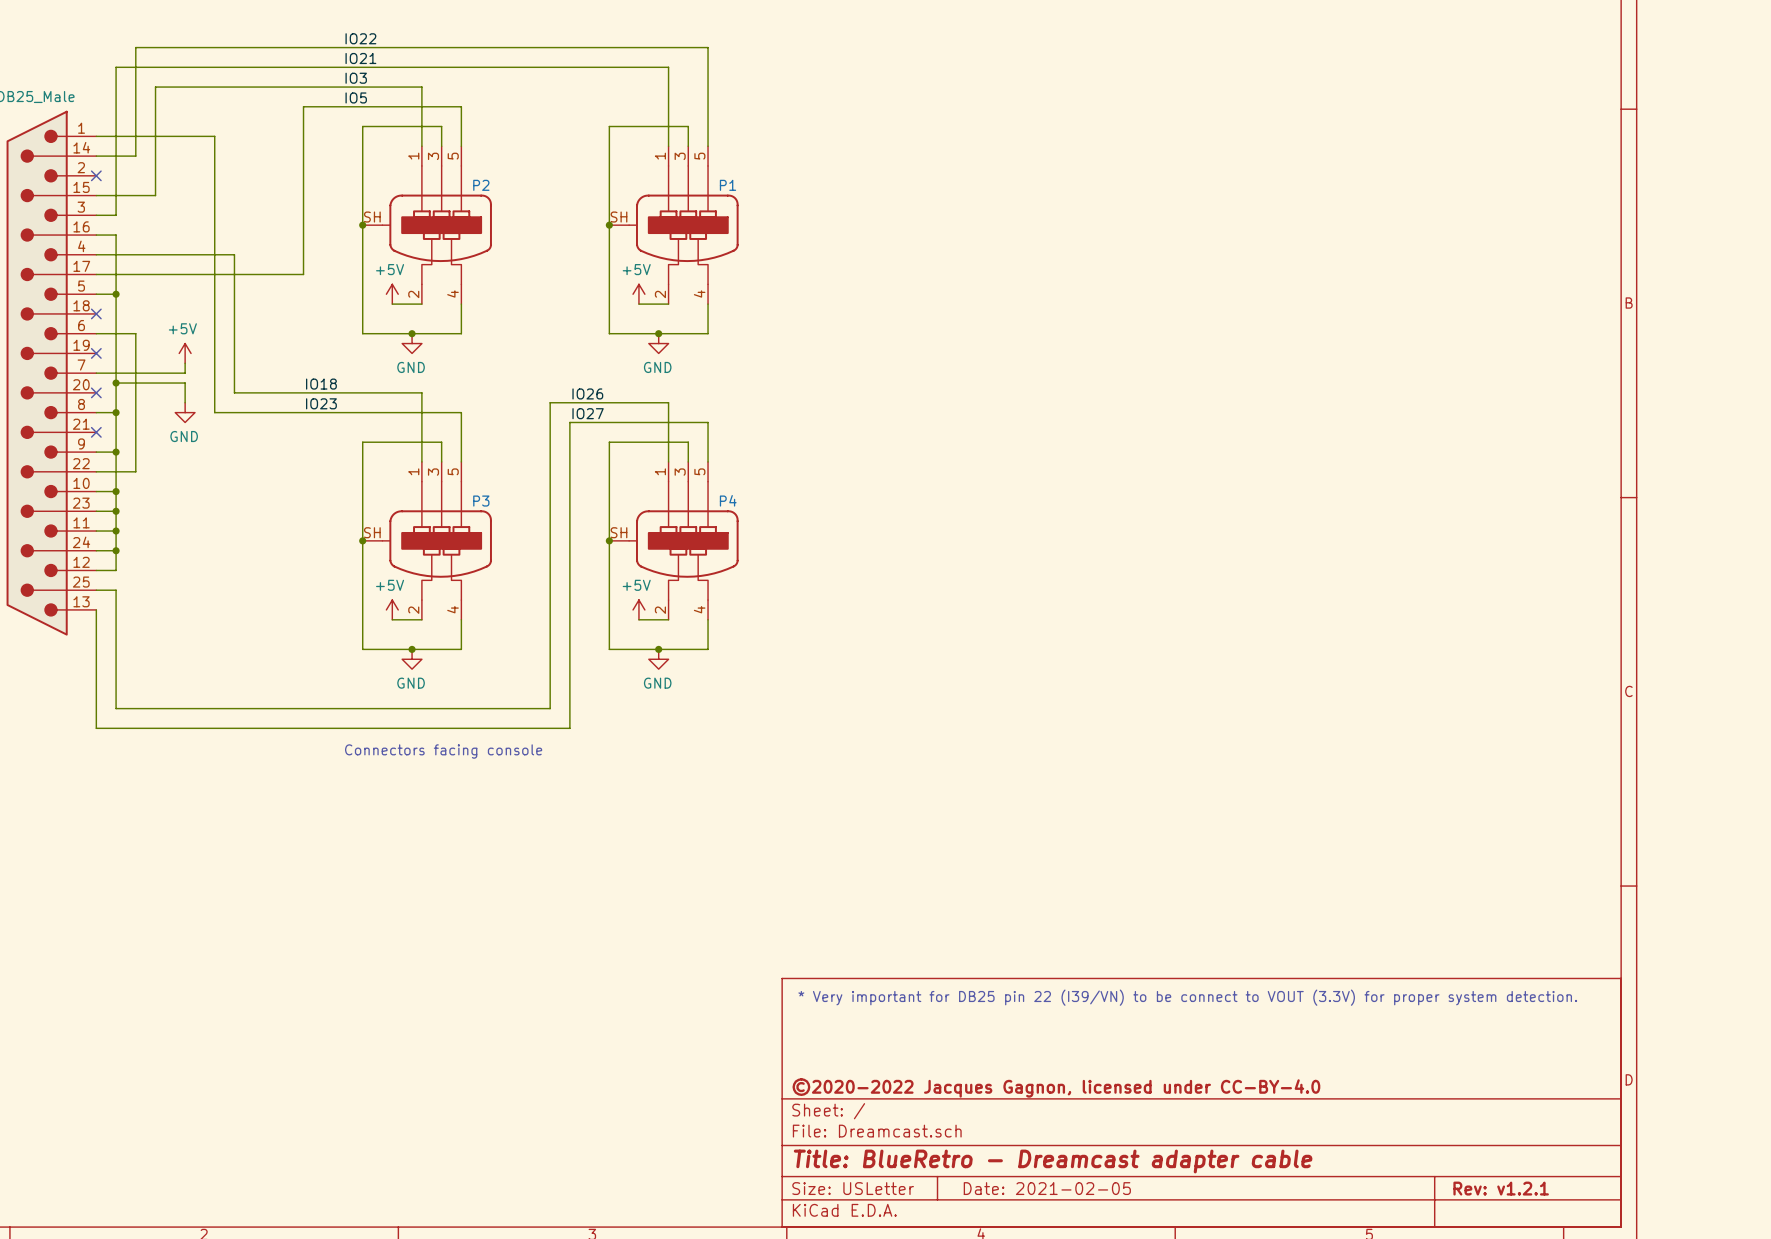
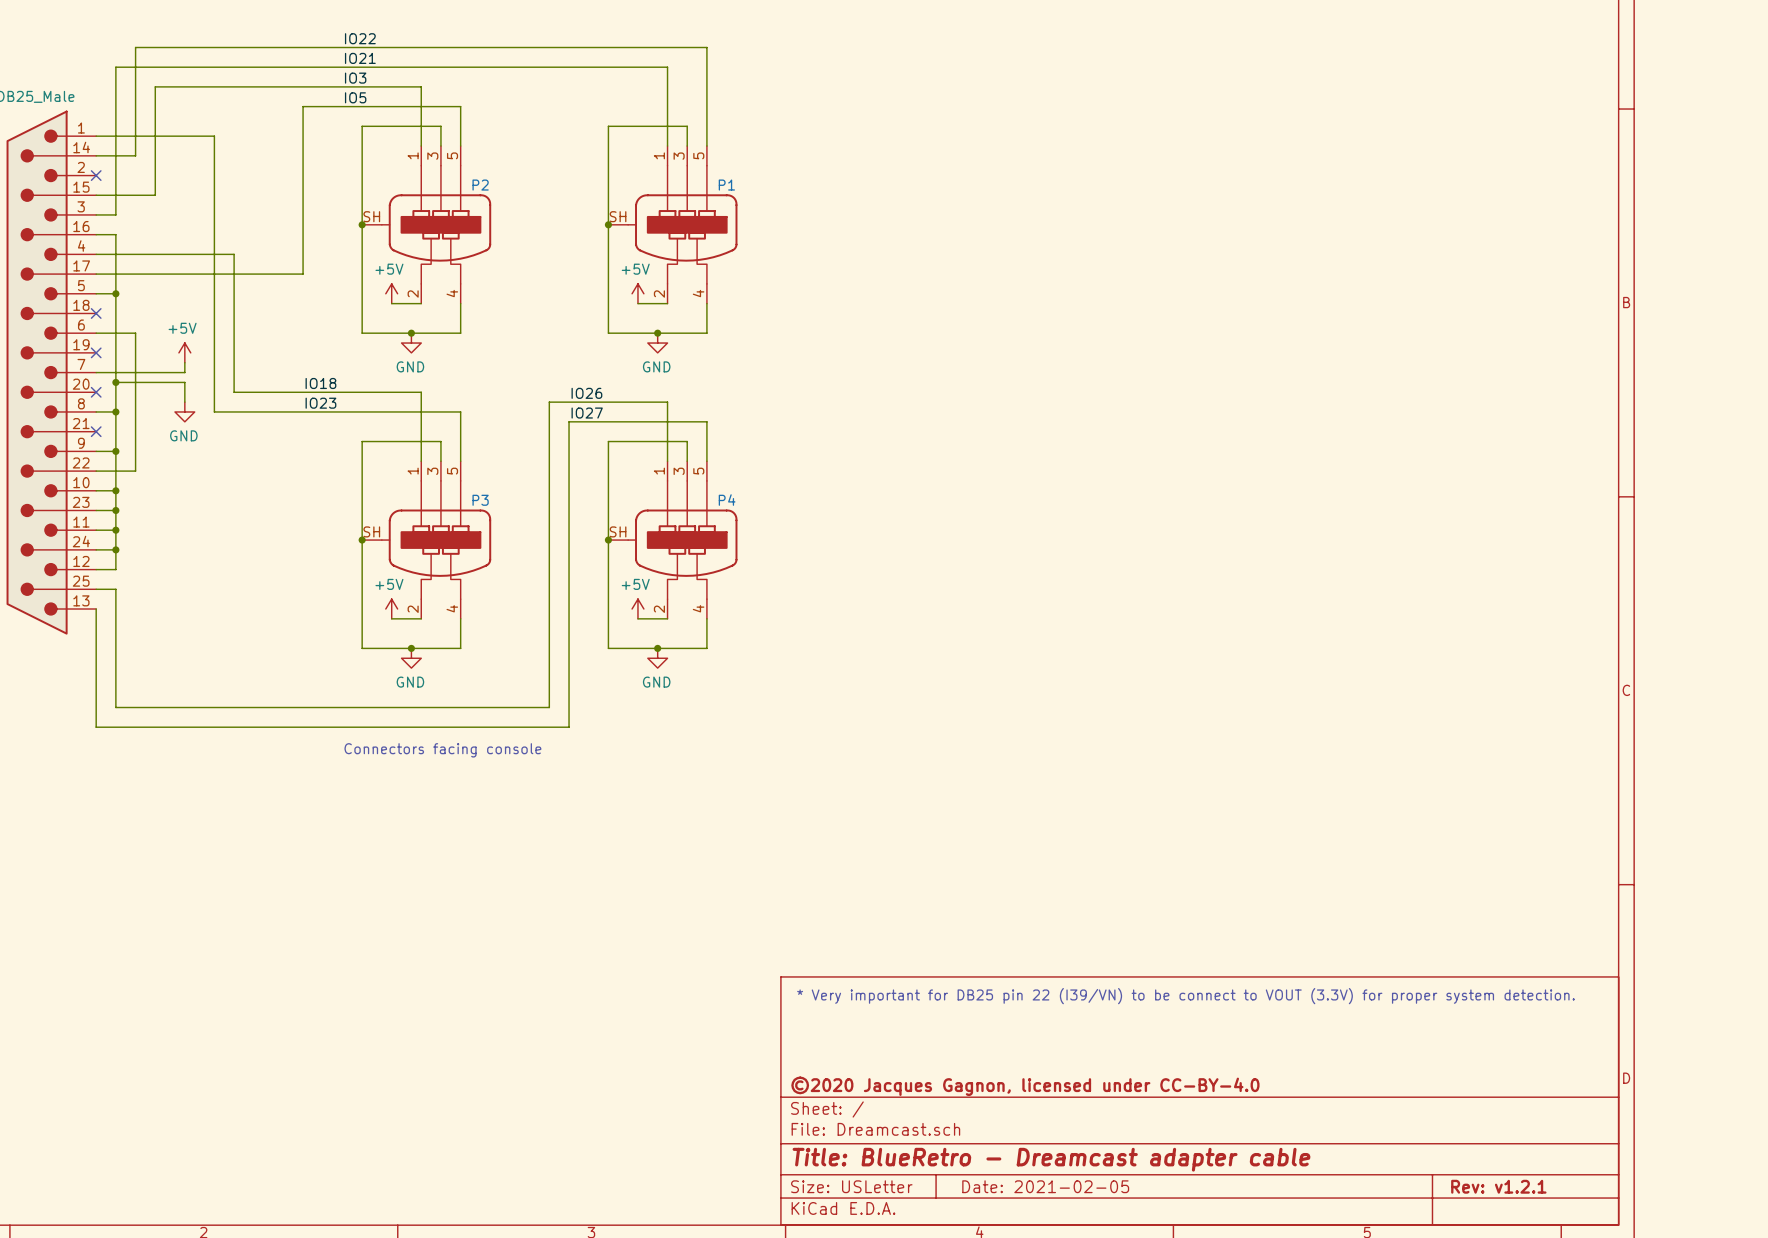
title block: ©2020-2022 Jacques Gagnon, licensed under CC-BY-4.0 (1056, 1087) -> ©2020 Jacques Gagnon, licensed under CC-BY-4.0 (1025, 1086)

